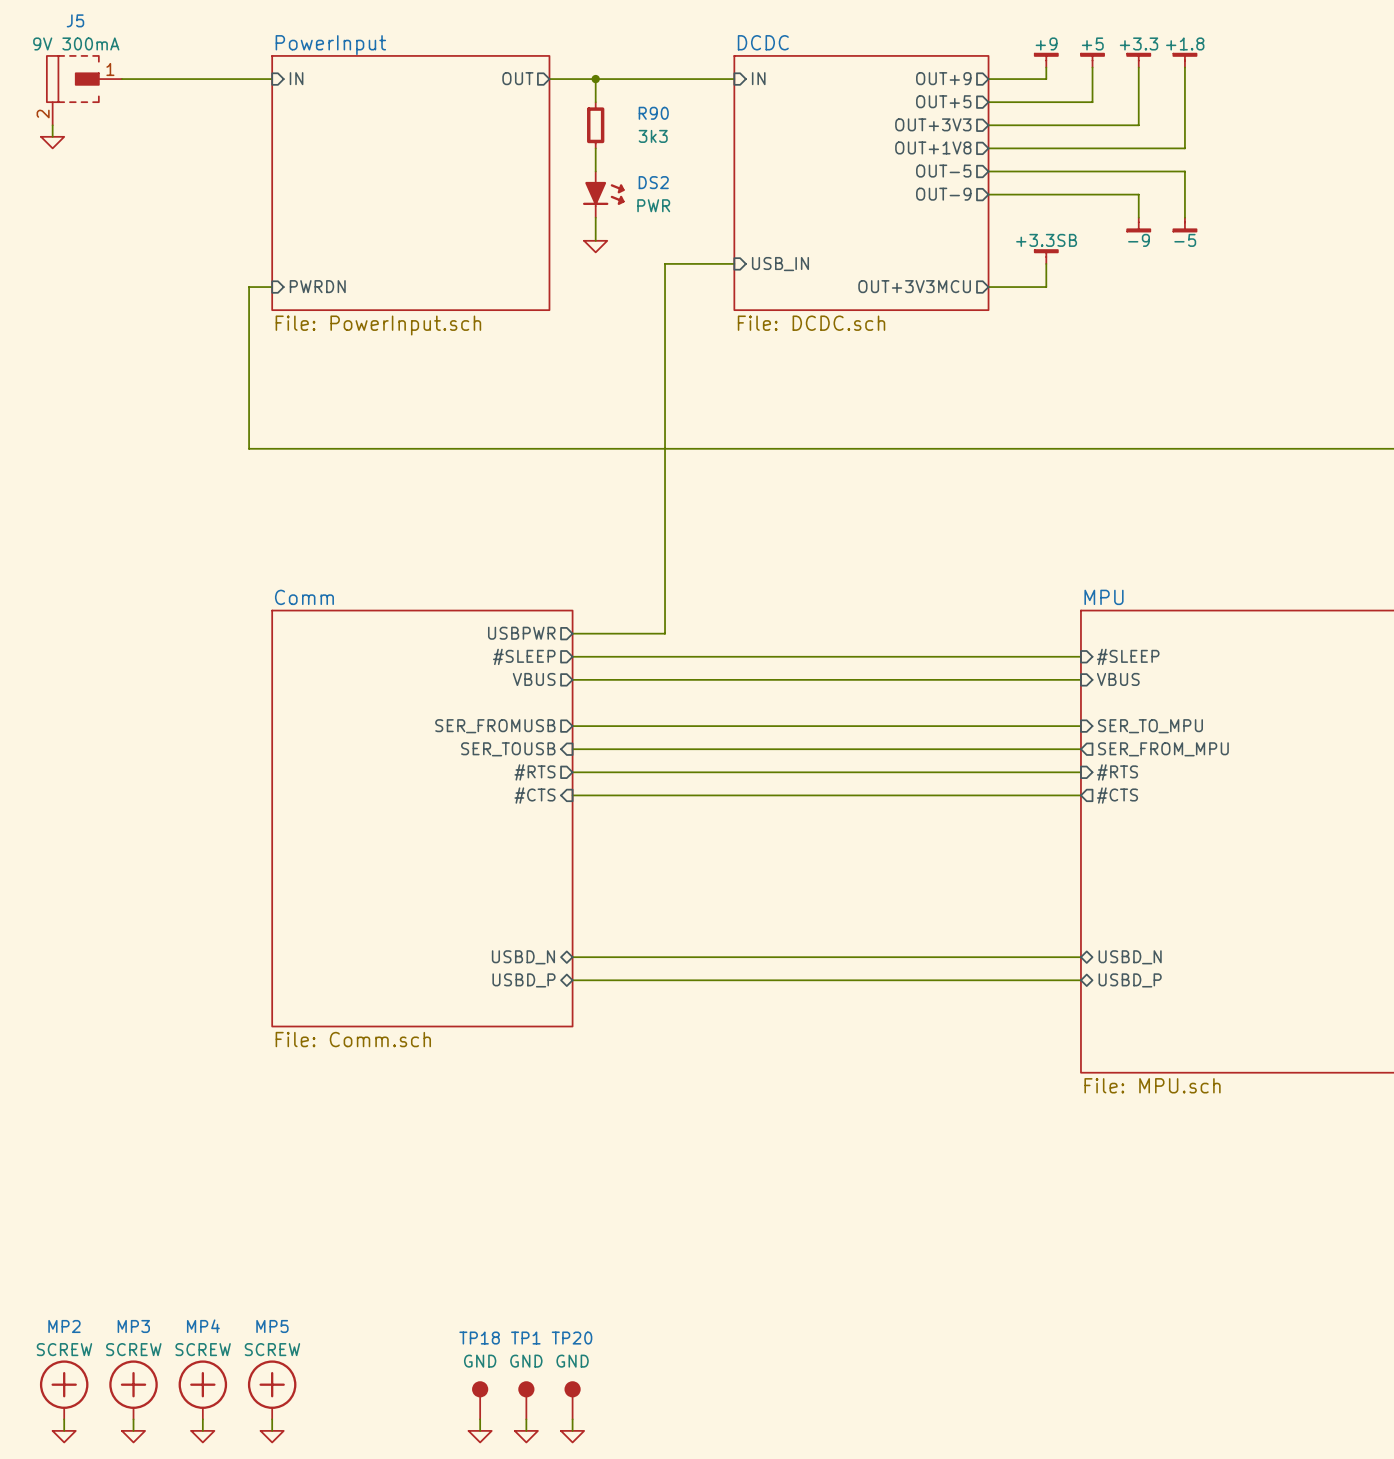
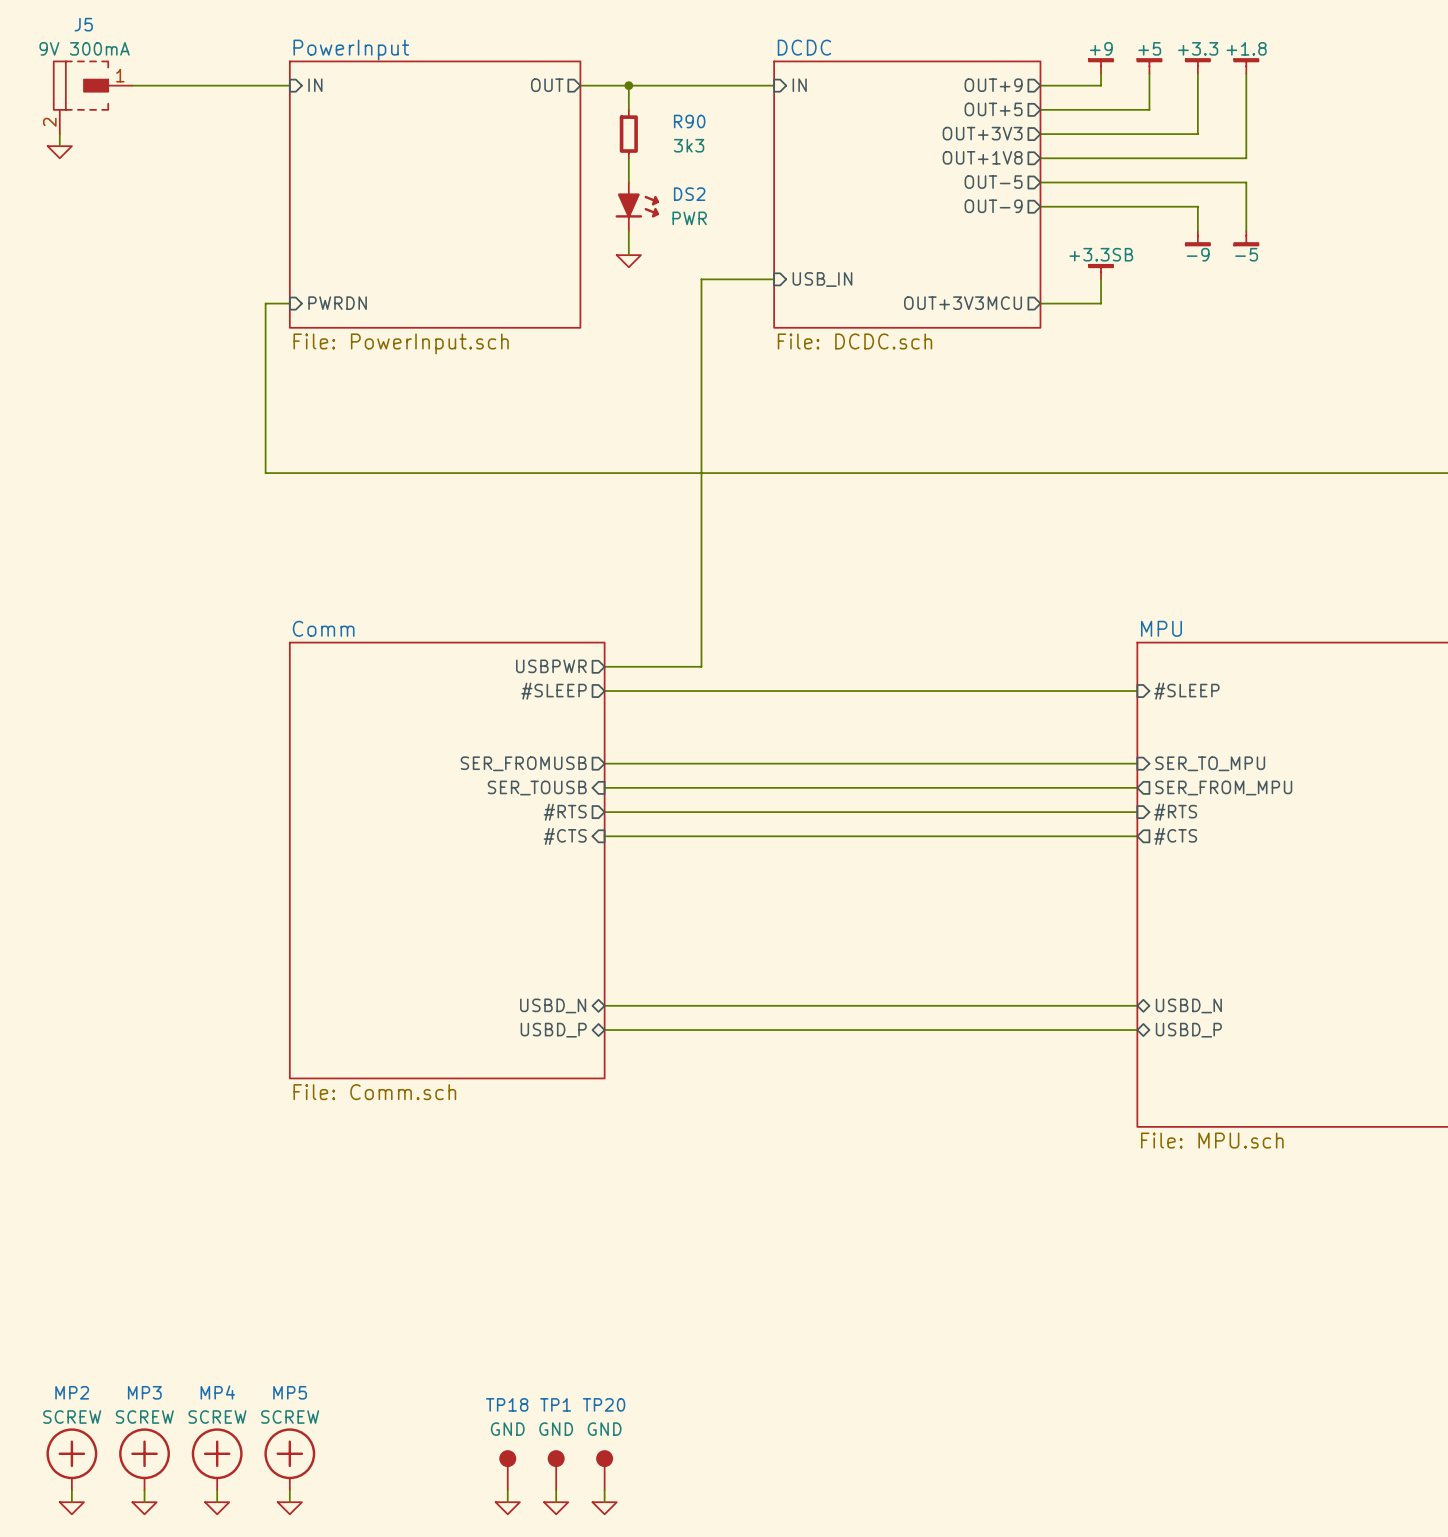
sheet pin: VBUS (534, 679) -> none
wire: (572, 679) (1080, 679) -> none
sheet pin: VBUS (1118, 679) -> none

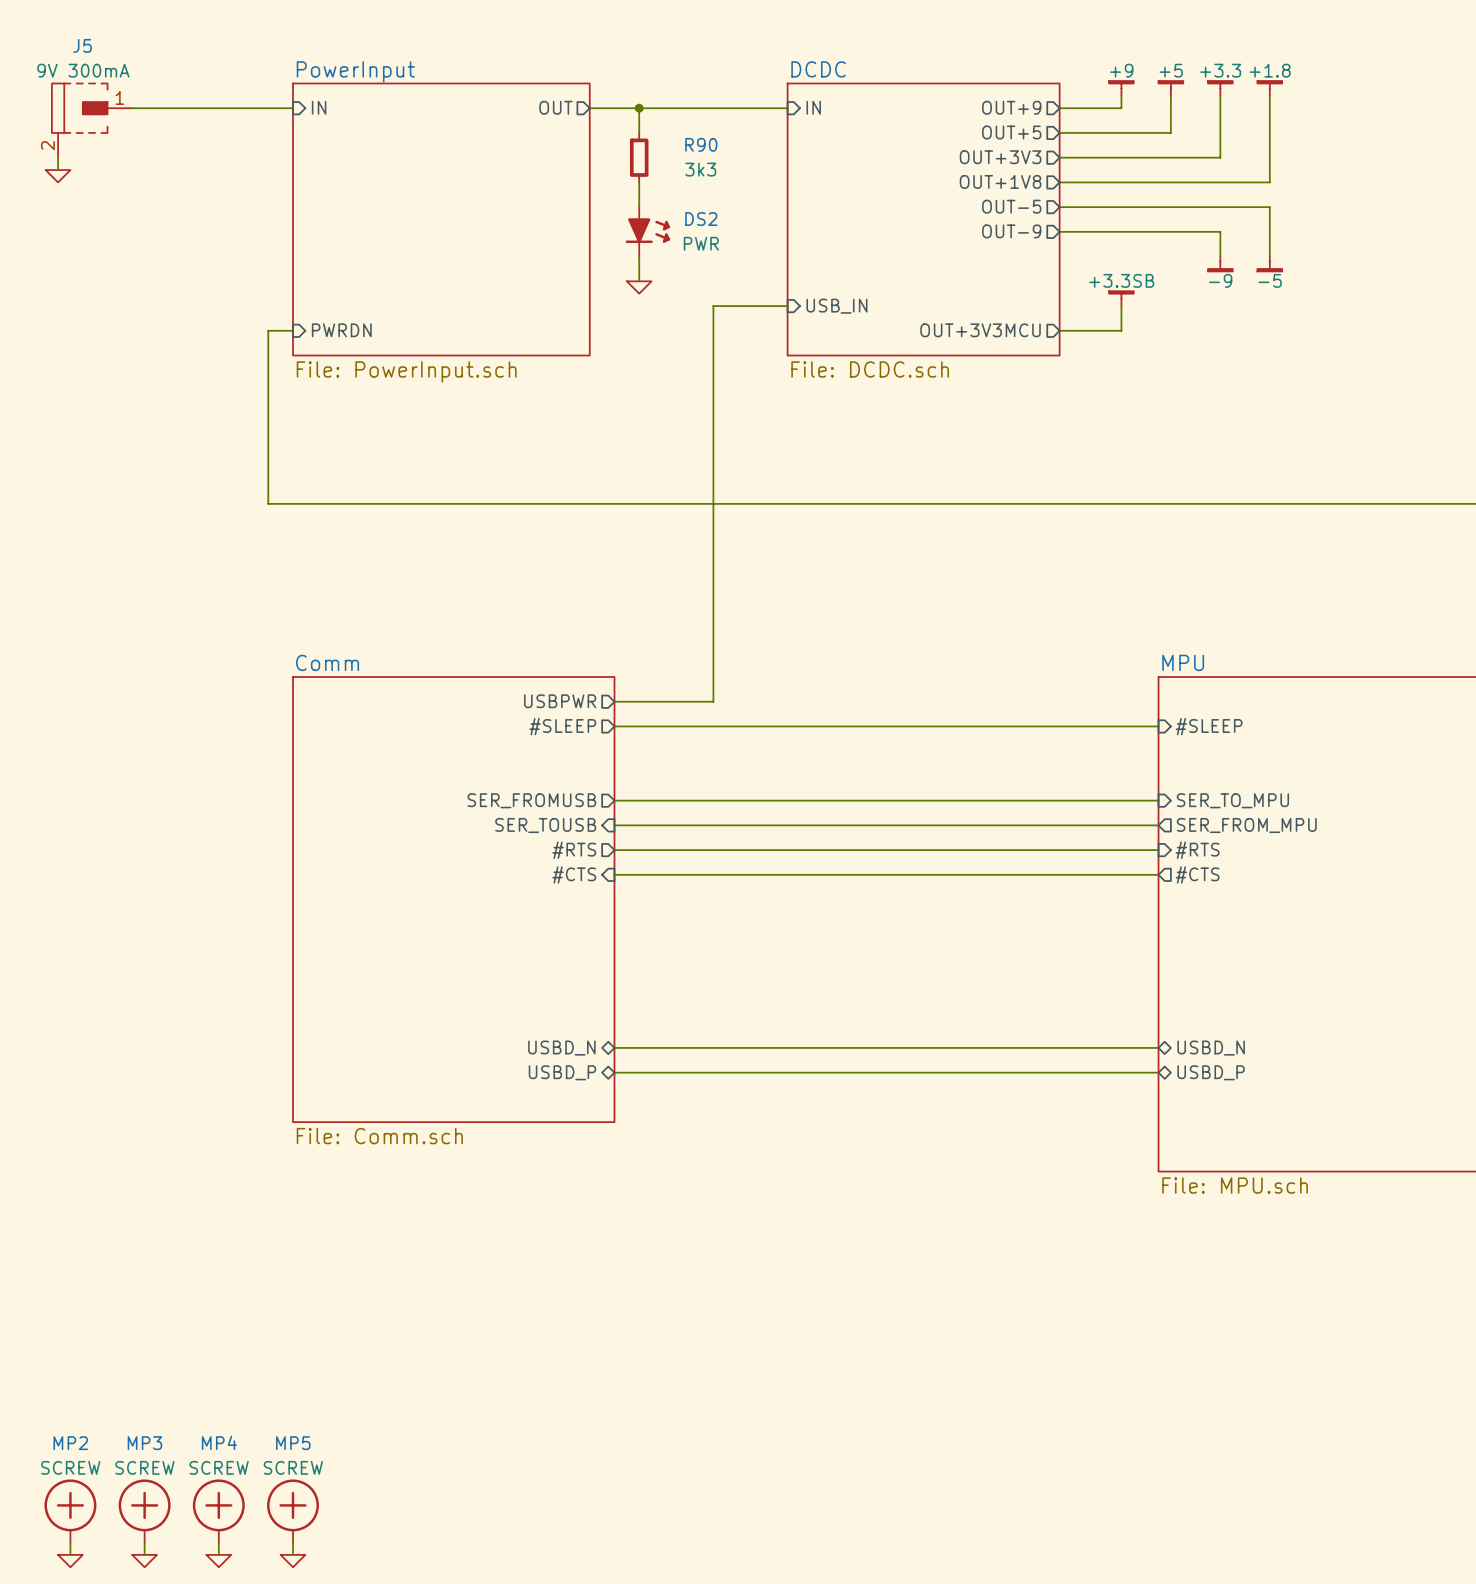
TP18: GND (507, 1470) -> none
TP1: GND (556, 1470) -> none
TP20: GND (604, 1470) -> none
wire: (507, 1490) (507, 1502) -> none
wire: (556, 1490) (556, 1502) -> none
wire: (604, 1490) (604, 1502) -> none
power symbol: (507, 1508) -> none
power symbol: (556, 1508) -> none
power symbol: (604, 1508) -> none

